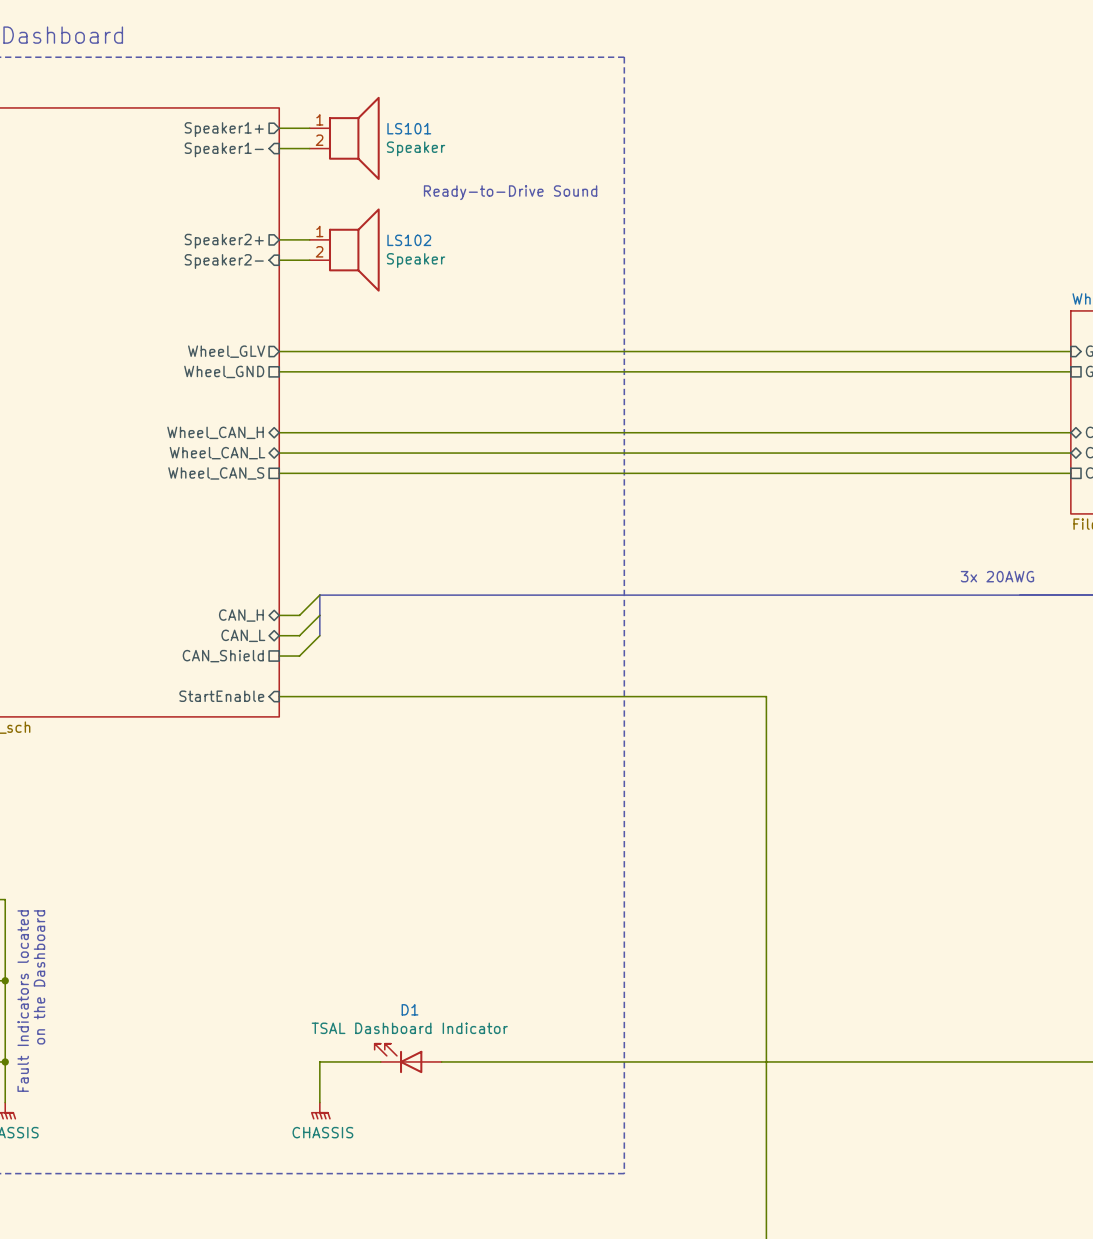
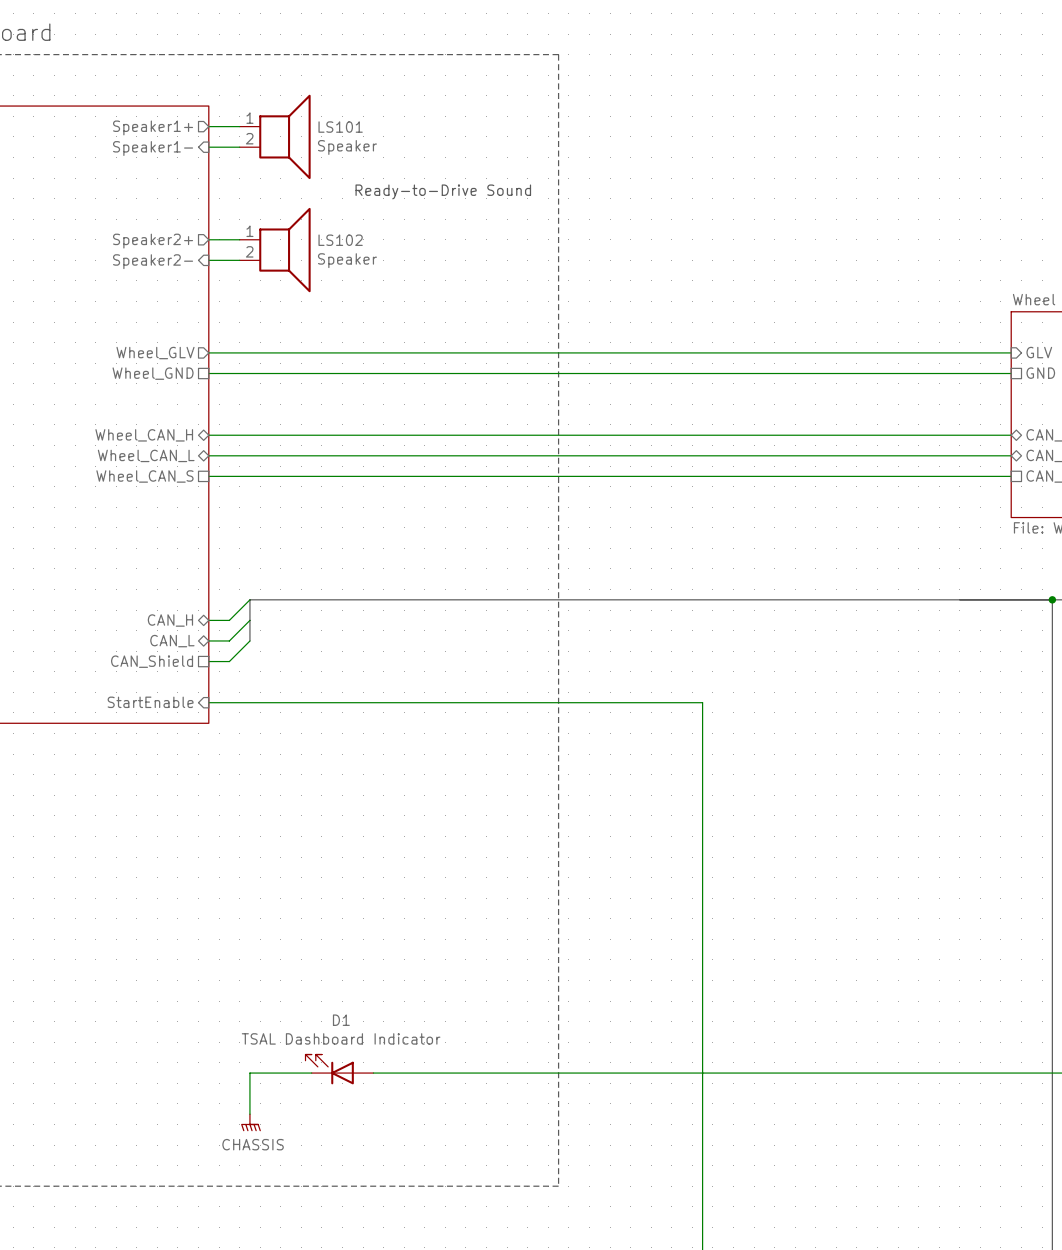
text: 3x 20AWG (997, 576) -> none

